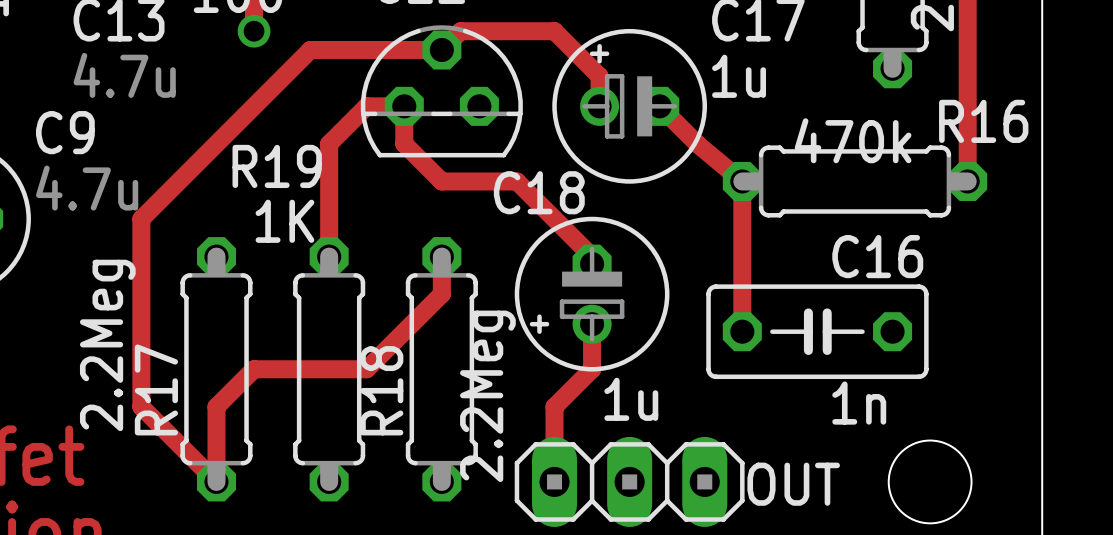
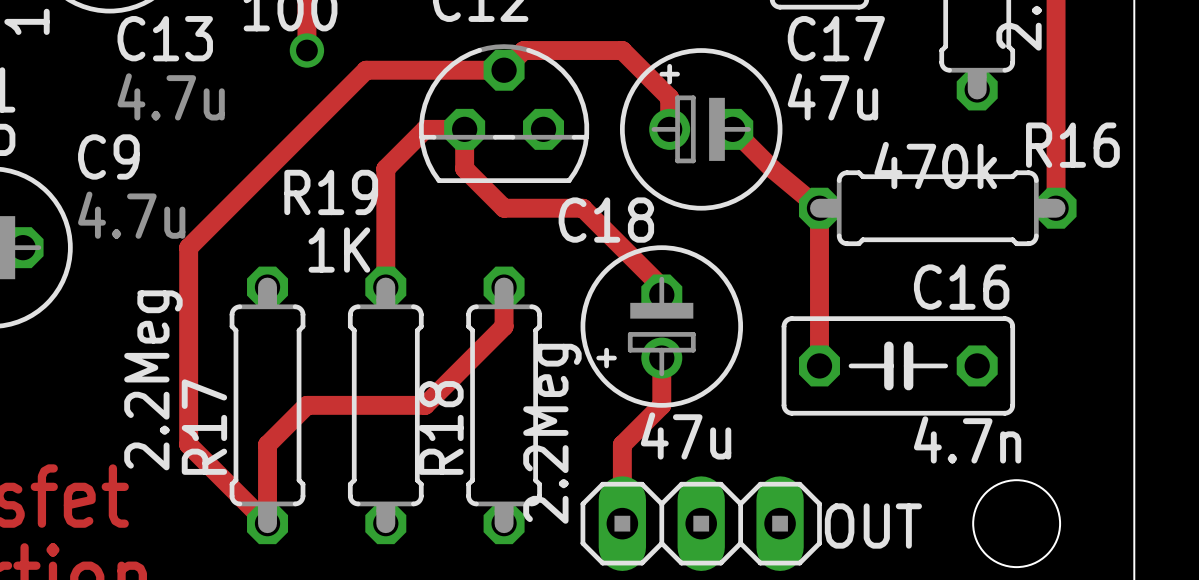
C17 value: 1u (739, 76) -> 47u (832, 96)
C18 value: 1u (631, 399) -> 47u (686, 435)
C16 value: 1n (859, 403) -> 4.7n (967, 439)

